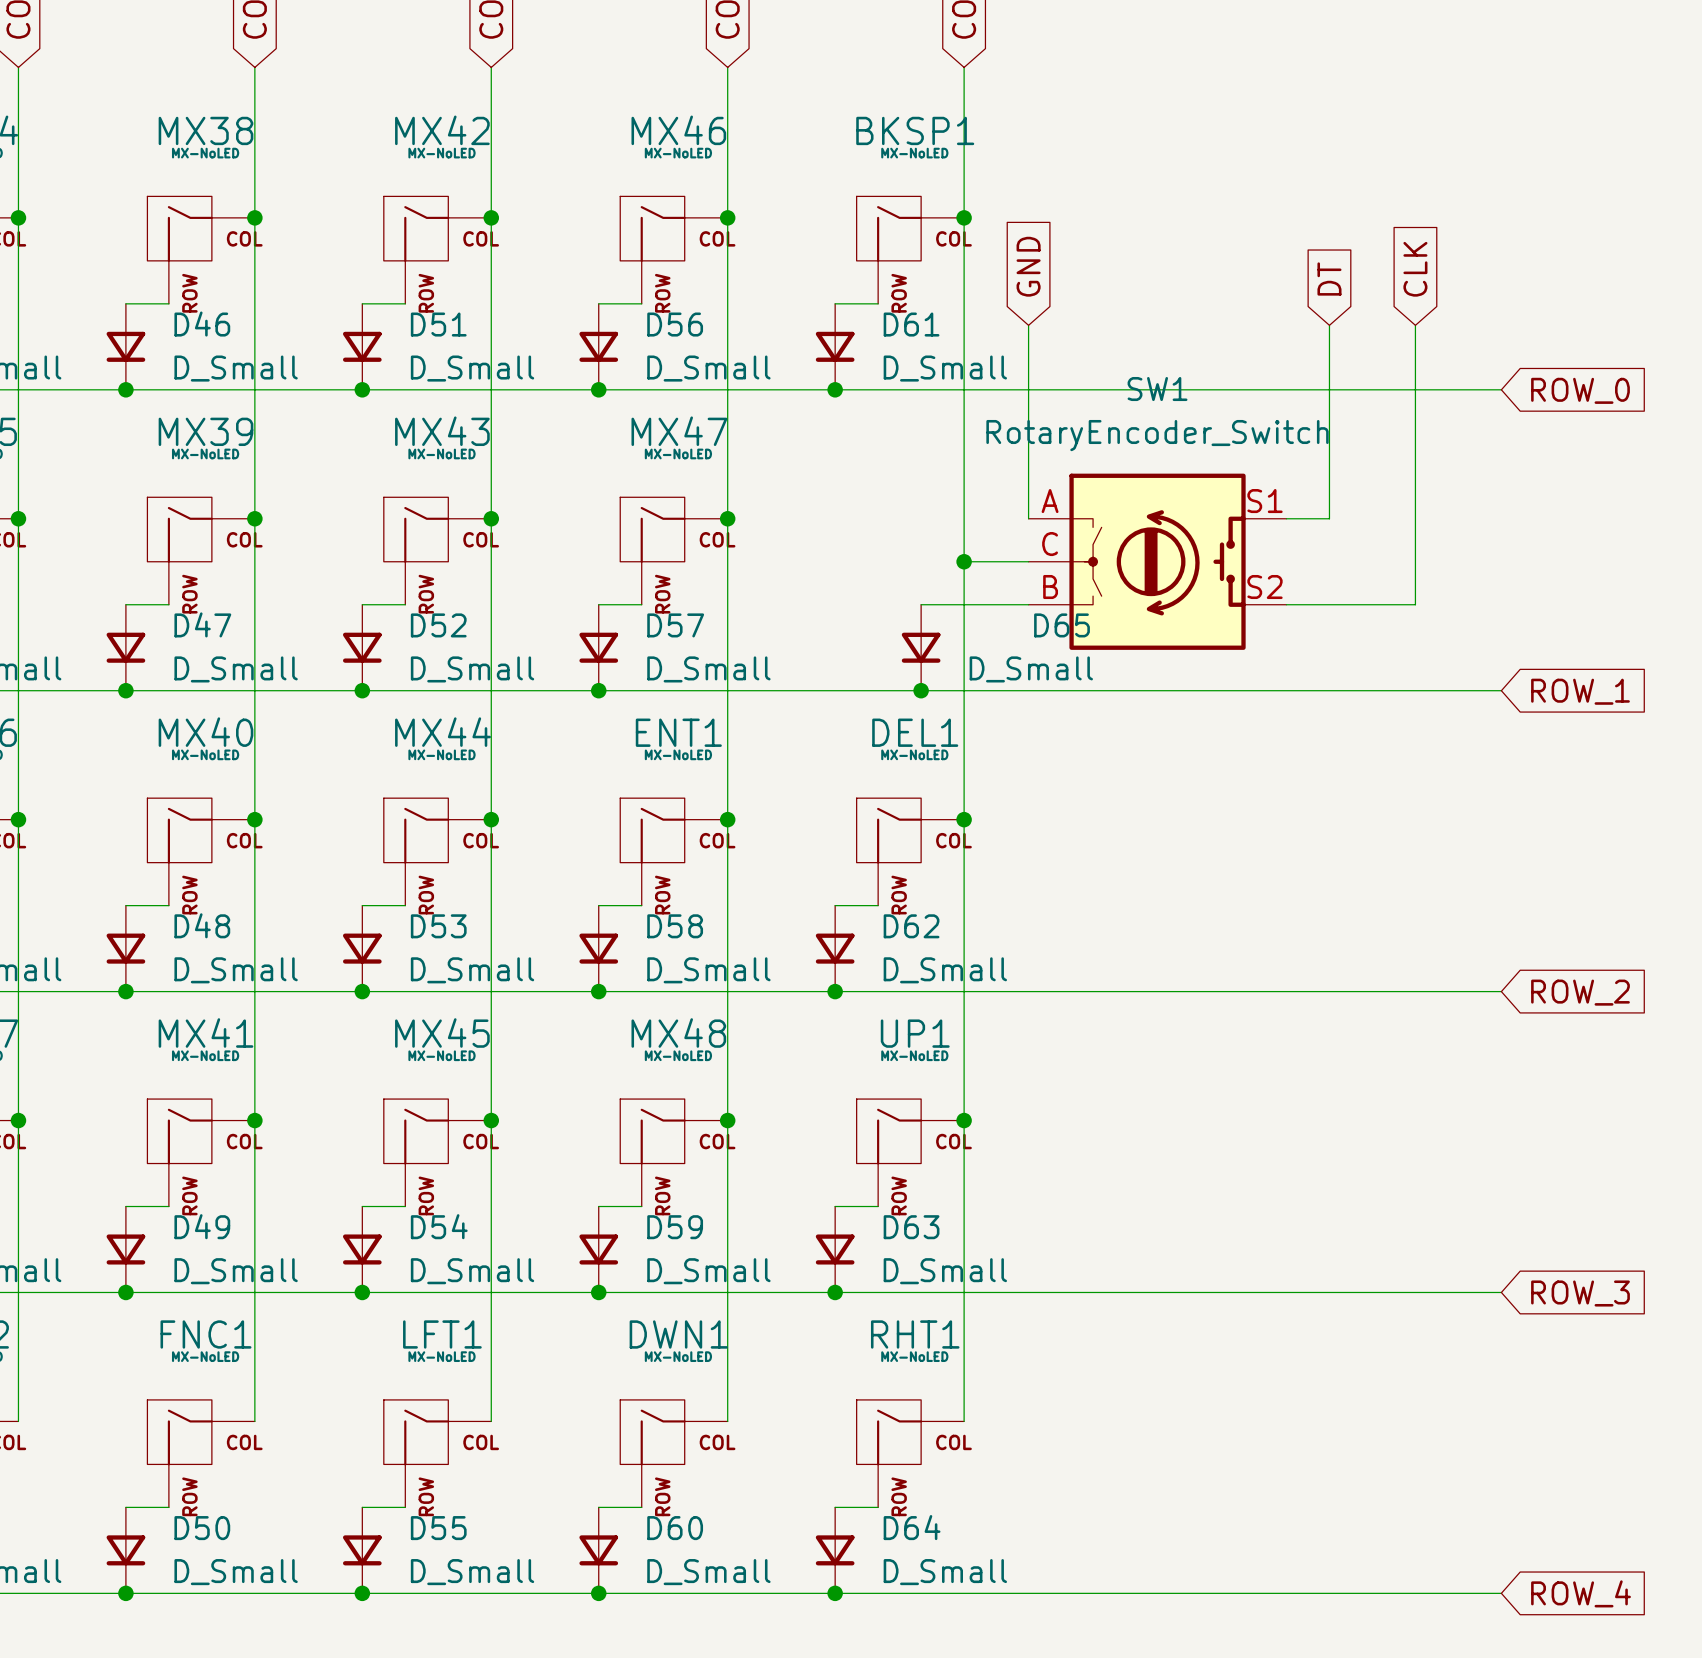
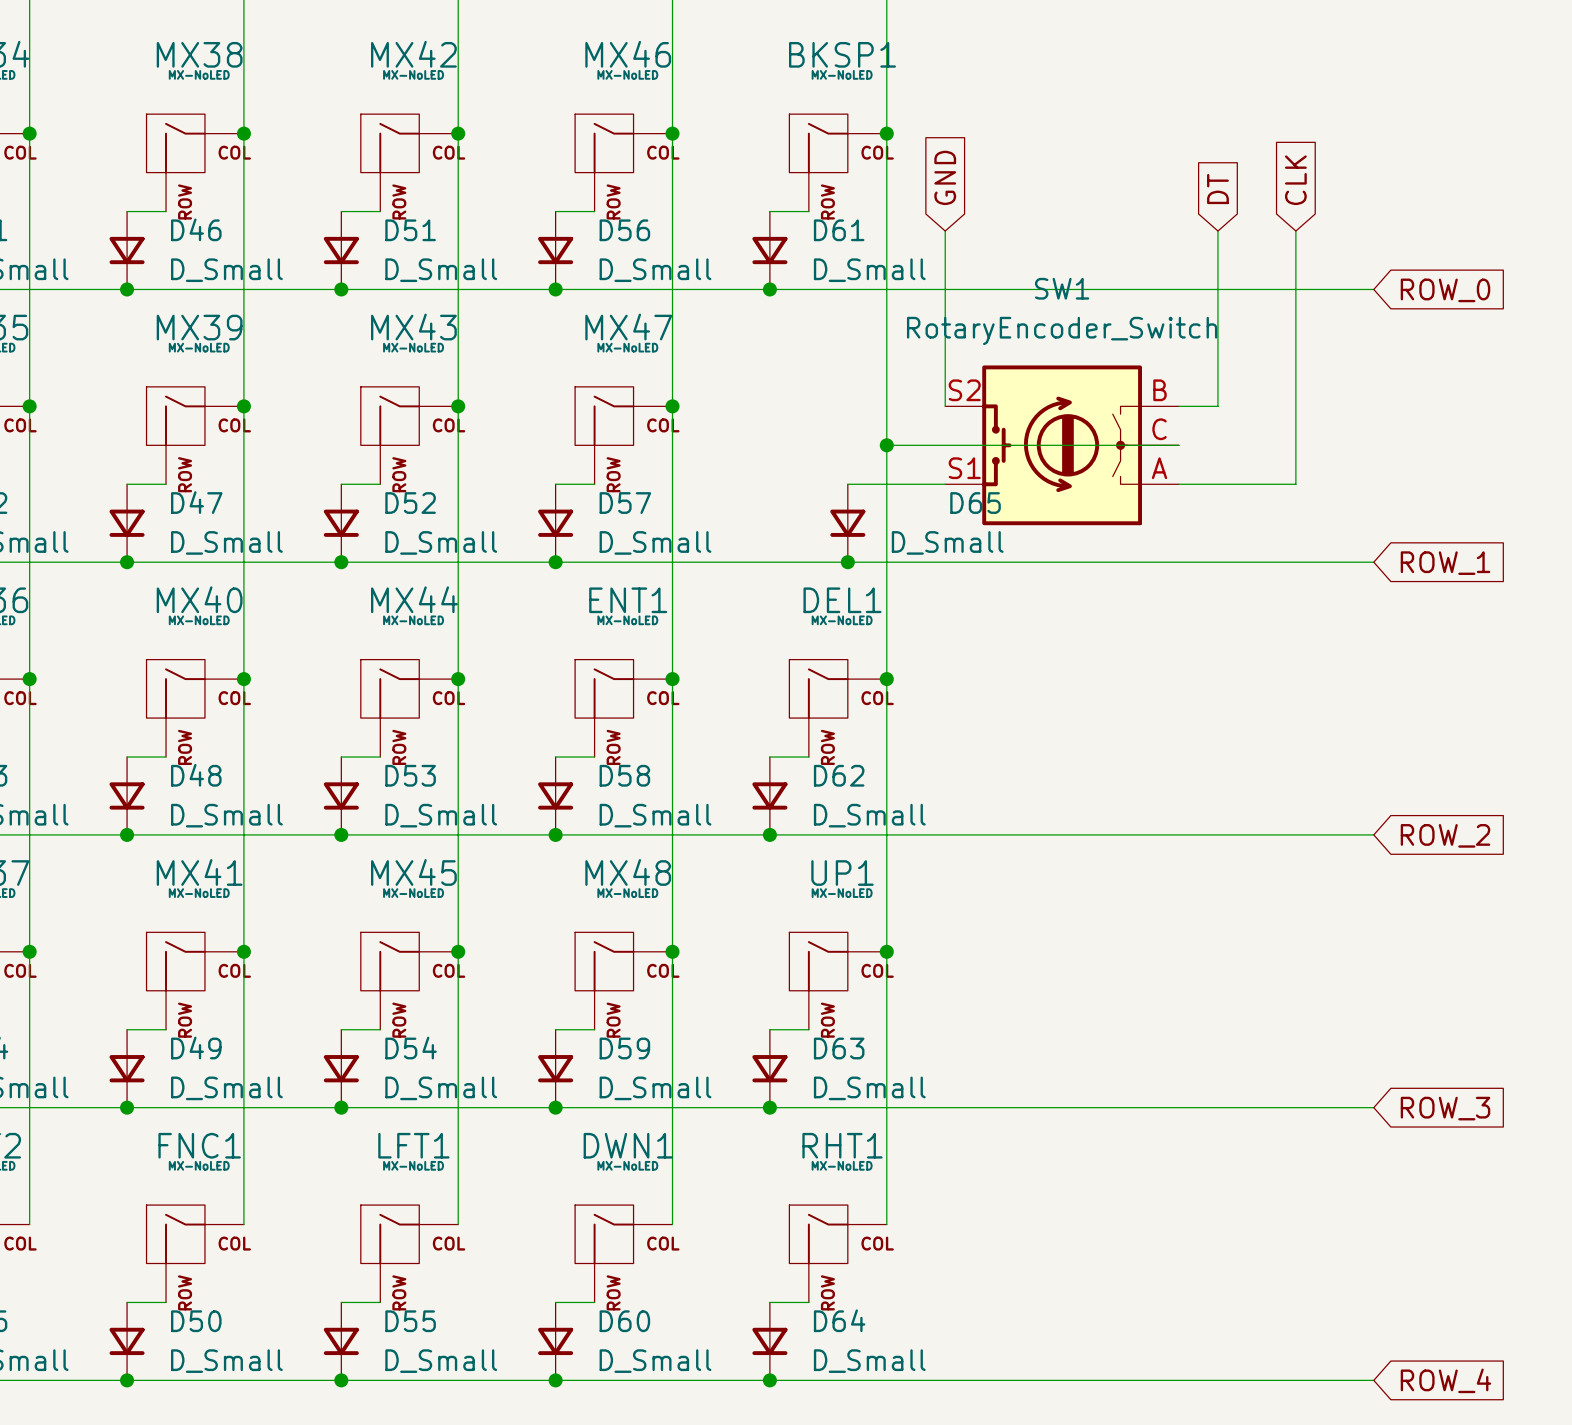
SW1 rotation: 0° (1157, 561) -> 180° (1062, 445)

